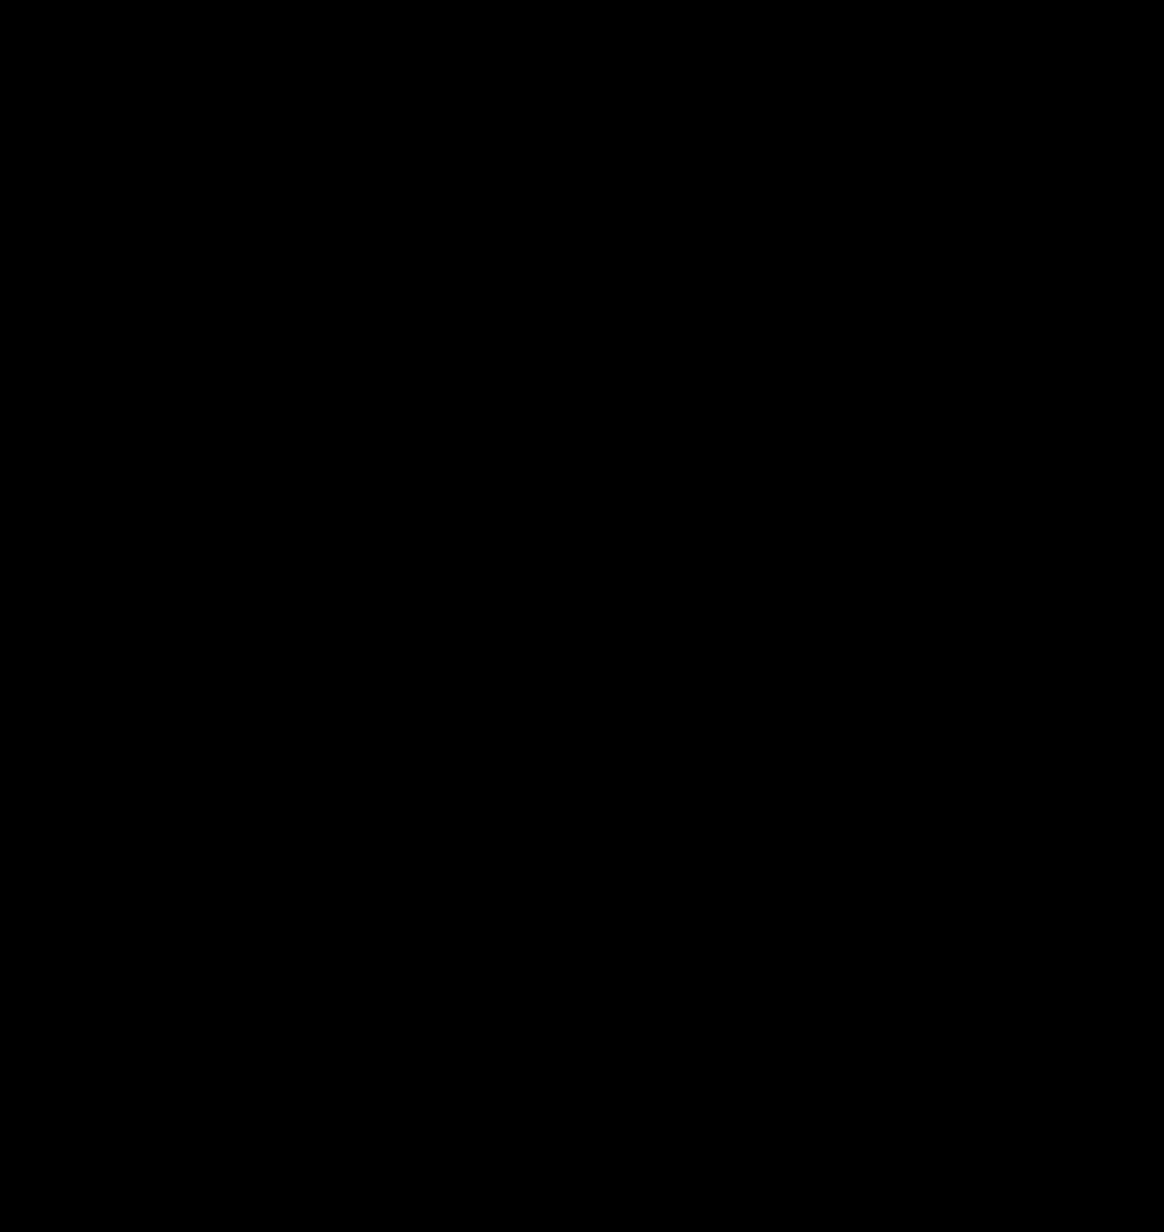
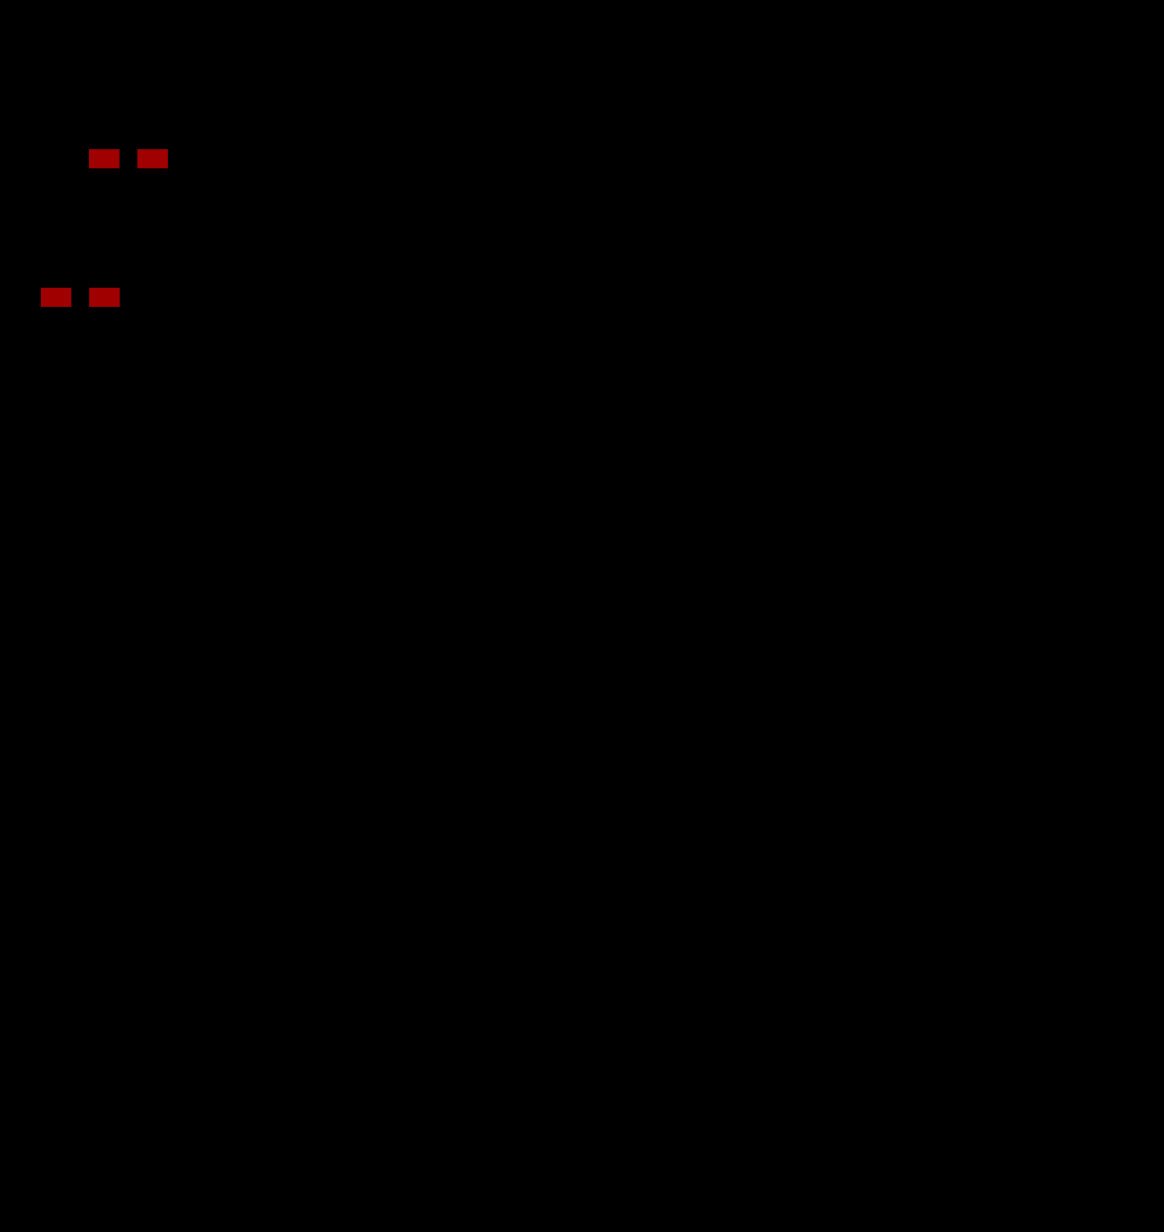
part: none -> (128, 158)
part: none -> (80, 297)

